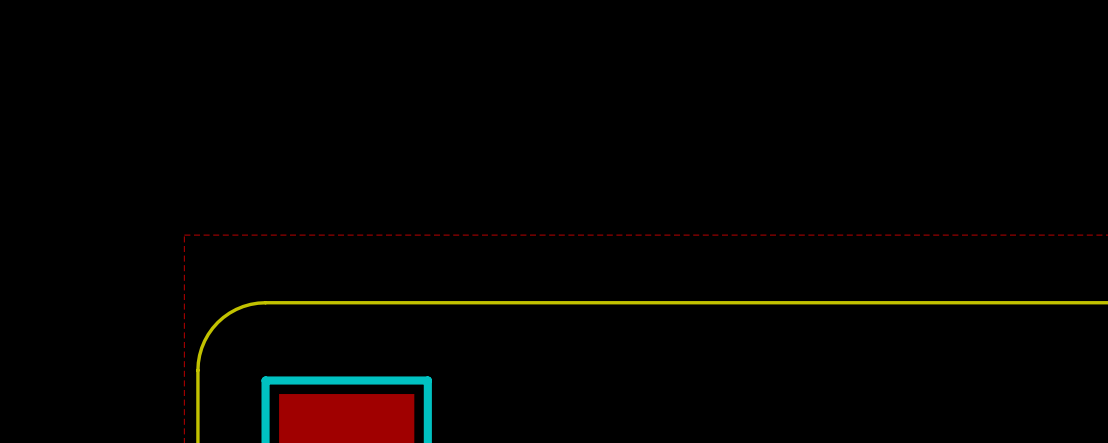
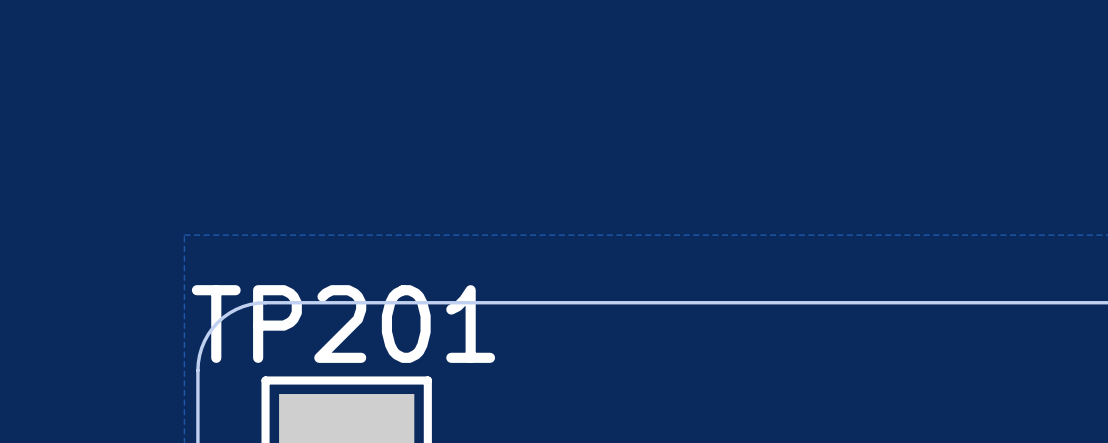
TP201 name: none -> TP201 (343, 324)

